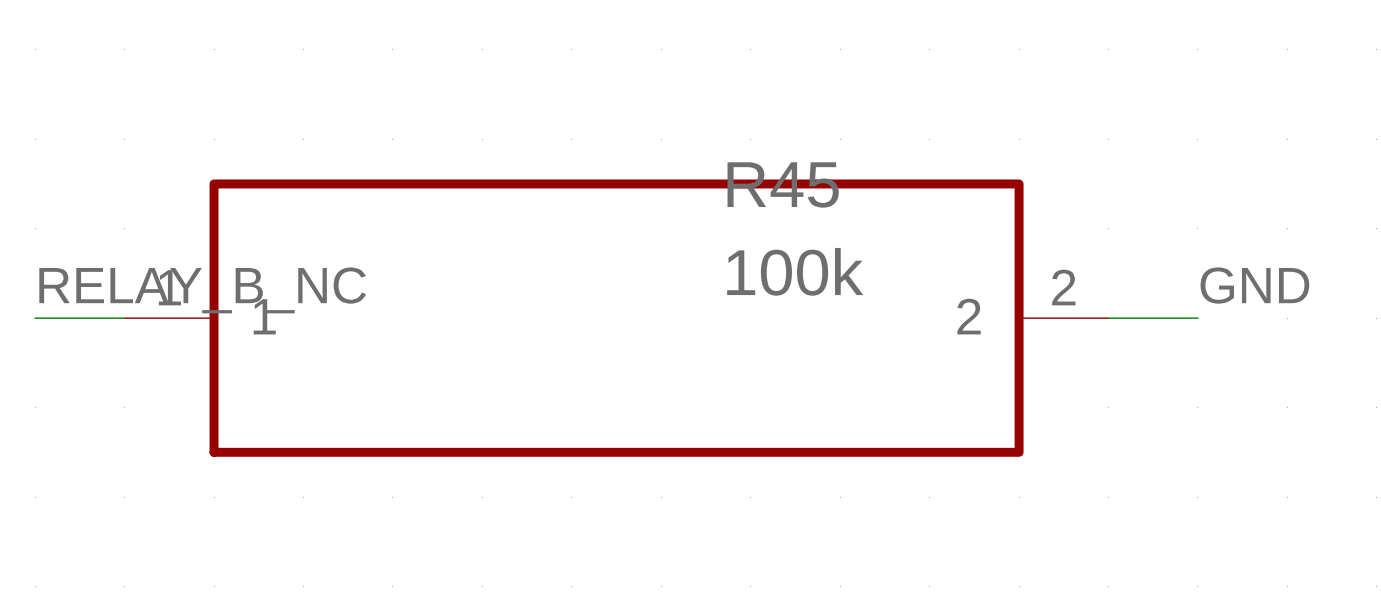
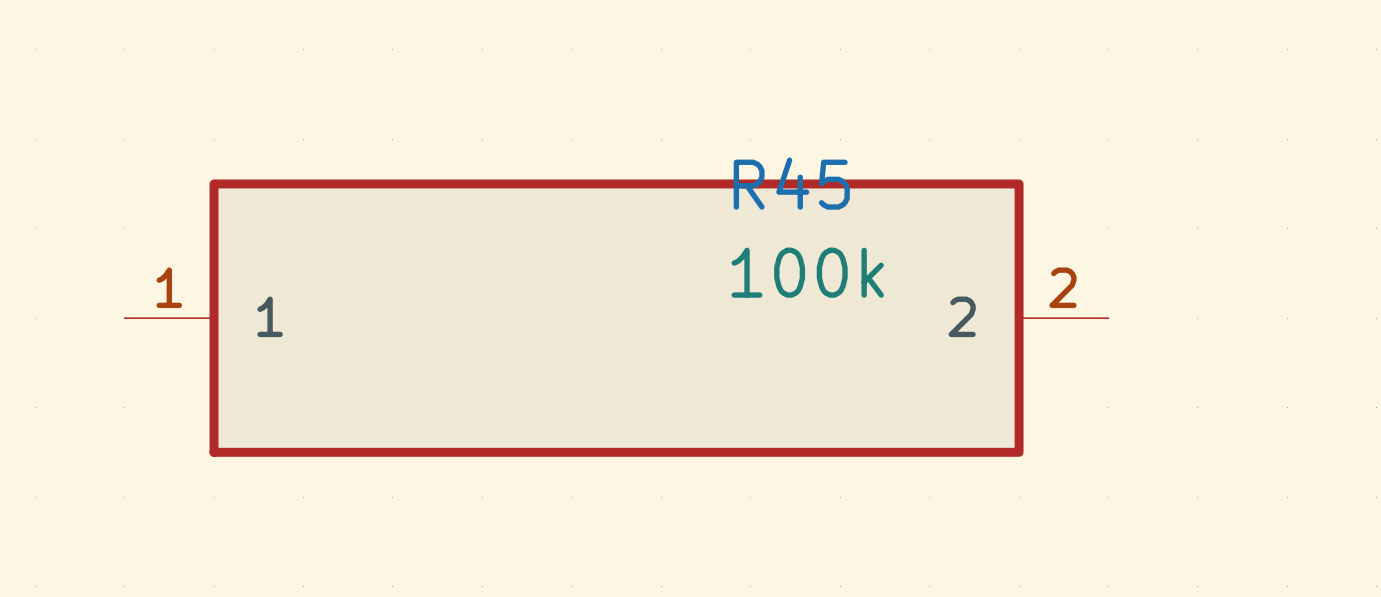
label: GND (1254, 285) -> none
label: RELAY_B_NC (202, 290) -> none
wire: (35, 318) (124, 318) -> none
wire: (1108, 318) (1197, 318) -> none

